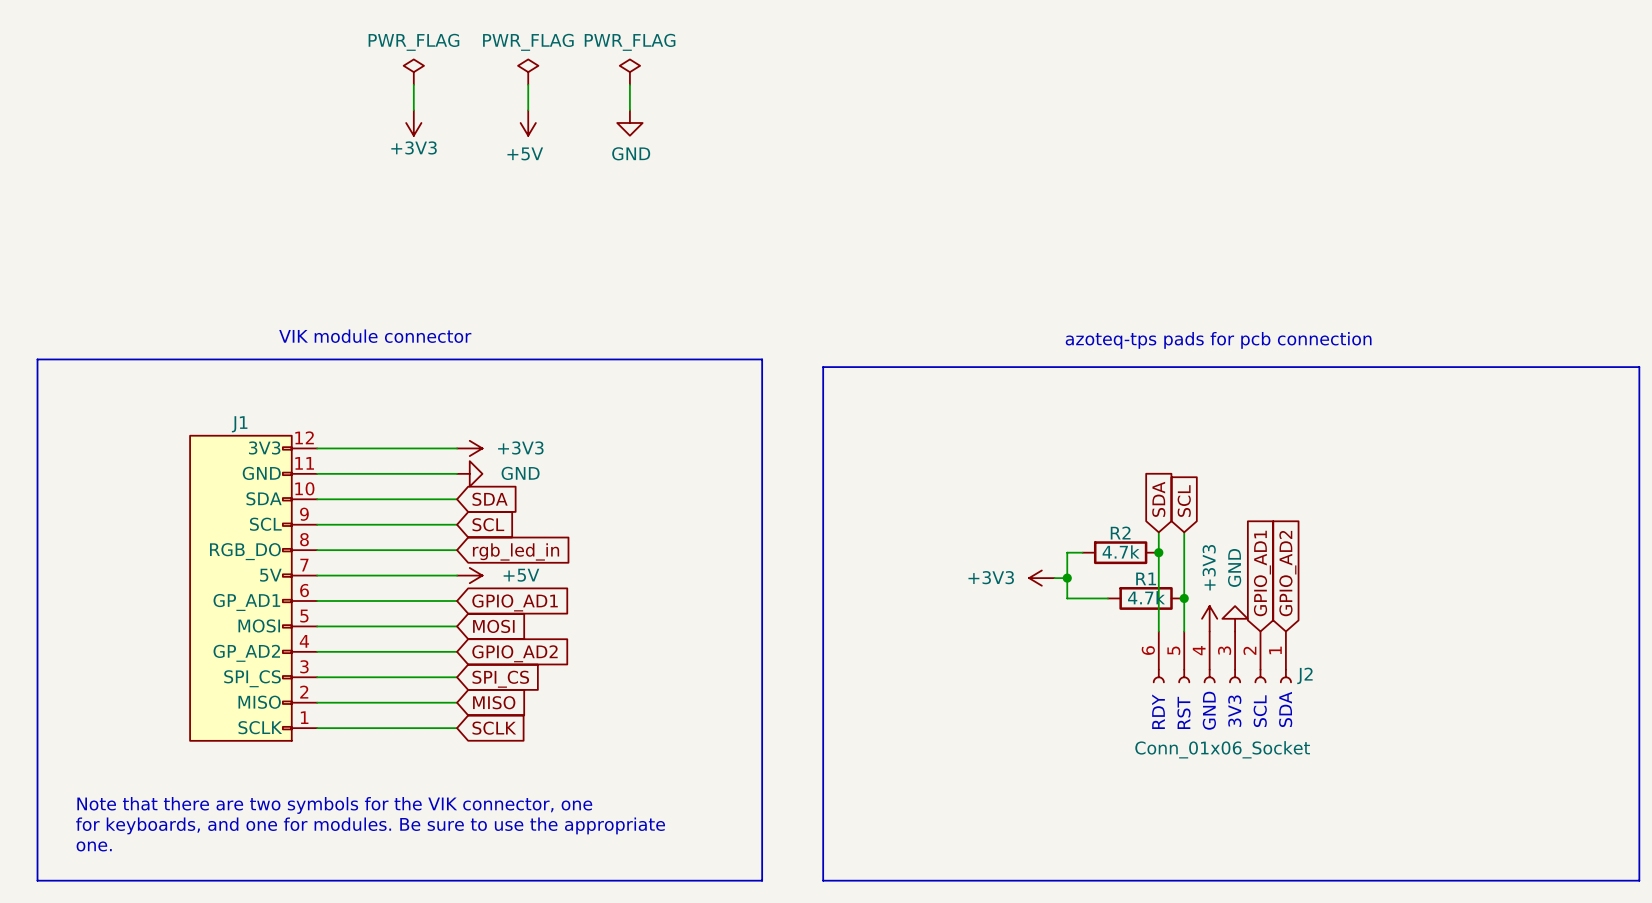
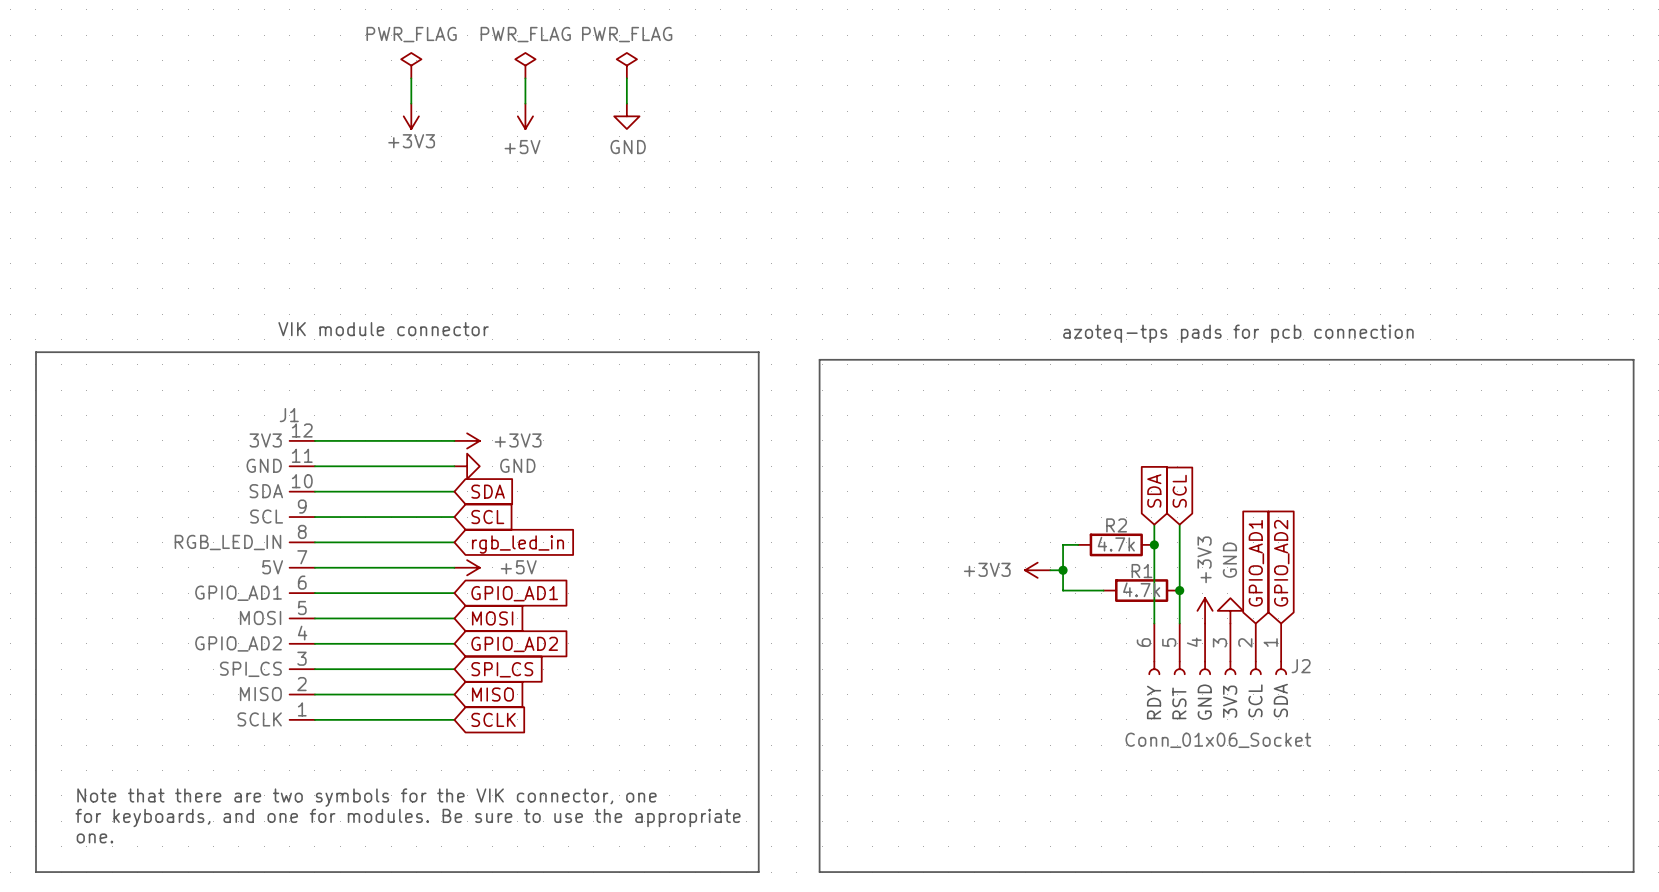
J1 symbol: [190, 435, 318, 741] -> [289, 440, 315, 720]

